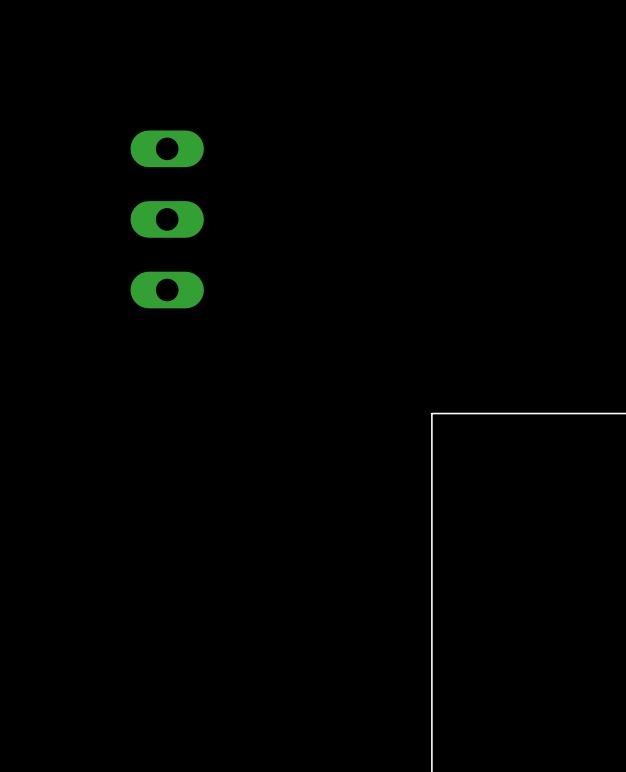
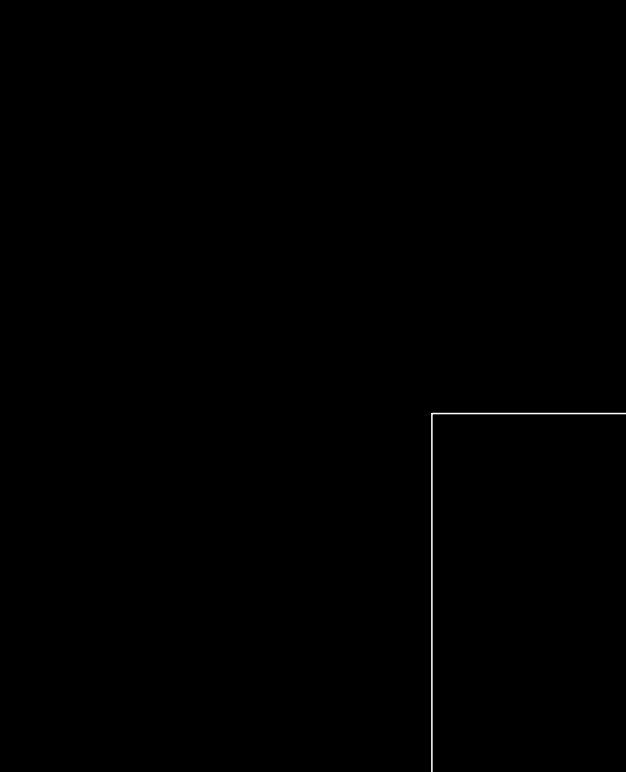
part: (167, 219) -> none

